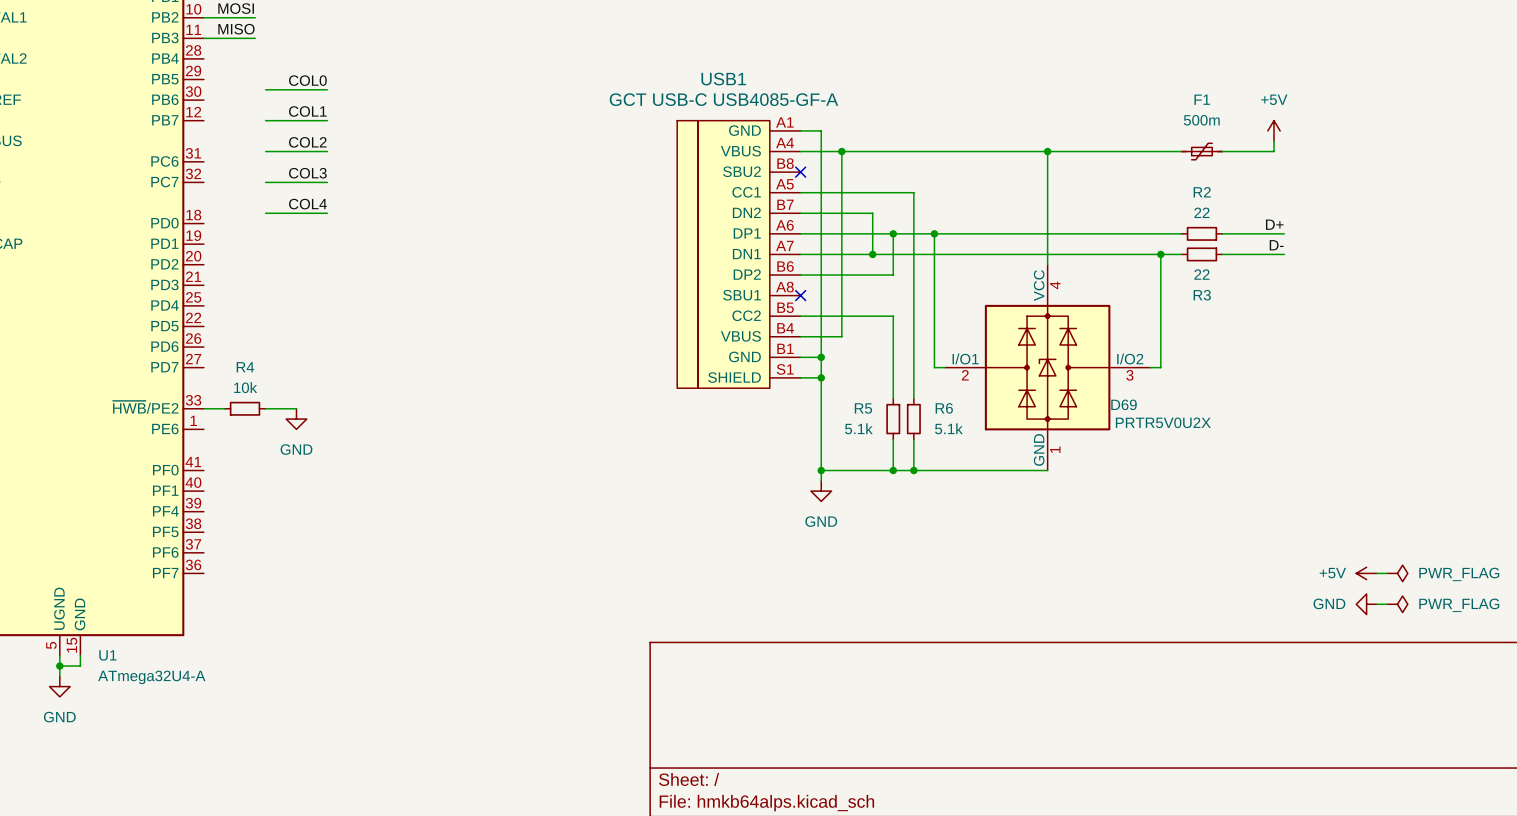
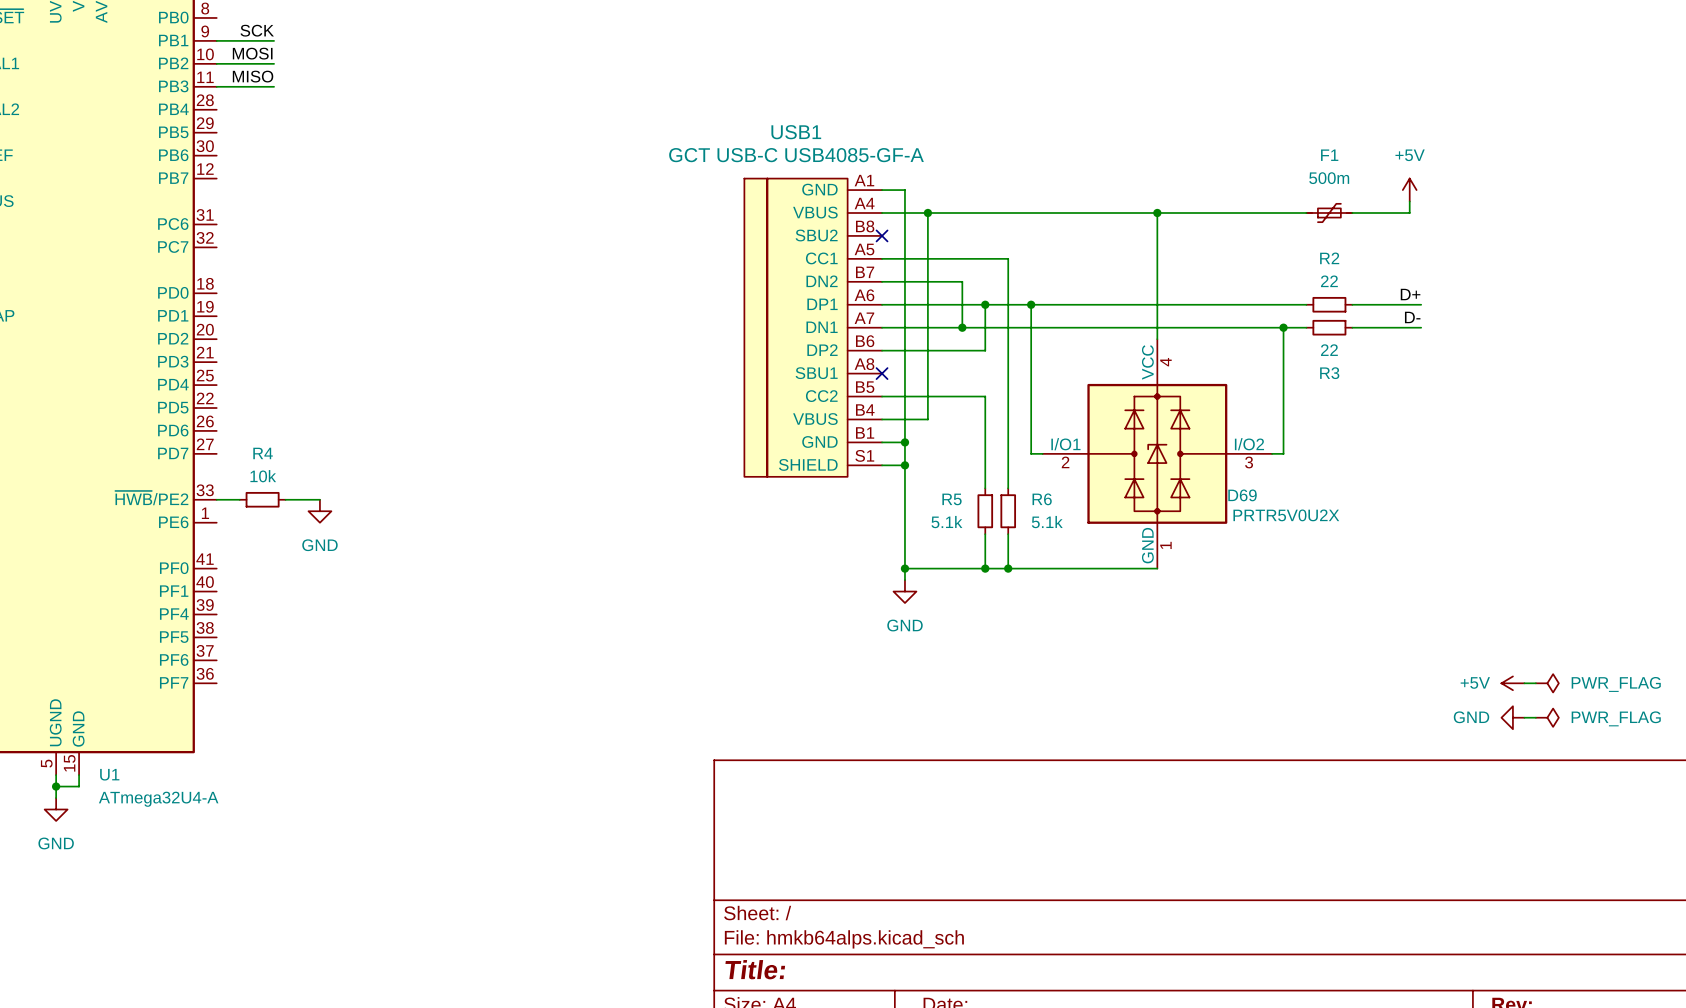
label: COL0 (307, 80) -> none
wire: (265, 89) (327, 89) -> none
label: COL1 (307, 111) -> none
wire: (265, 120) (327, 120) -> none
label: COL2 (307, 142) -> none
wire: (265, 151) (327, 151) -> none
label: COL3 (307, 173) -> none
wire: (265, 182) (327, 182) -> none
label: COL4 (307, 204) -> none
wire: (265, 213) (327, 213) -> none

